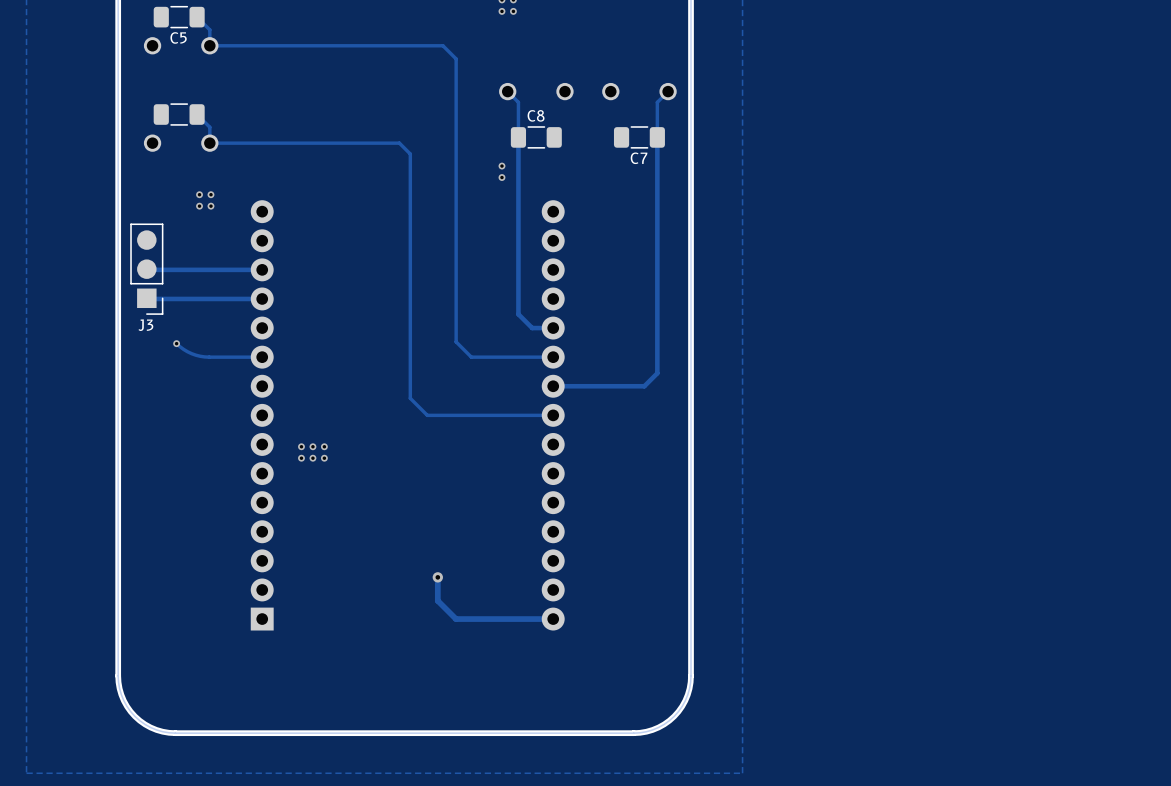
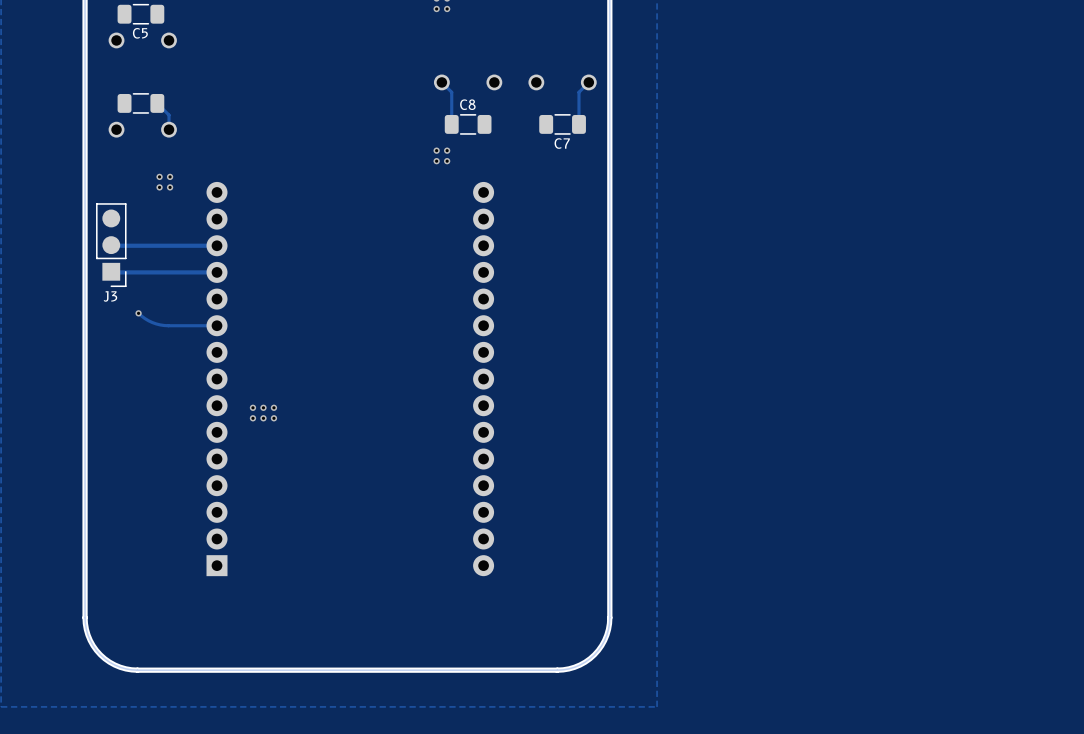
track: (197, 17) (209, 29) (209, 45) (442, 45) (456, 58) (456, 341) (471, 357) (553, 357) -> none
track: (518, 137) (518, 314) (532, 328) (553, 328) -> none
track: (657, 137) (657, 373) (644, 386) (553, 386) -> none
track: (209, 143) (399, 143) (410, 154) (410, 398) (427, 415) (553, 415) -> none
via: none -> (447, 150)
via: none -> (447, 161)
track: (437, 577) (437, 600) (456, 619) (553, 619) -> none
via: (437, 577) -> none

